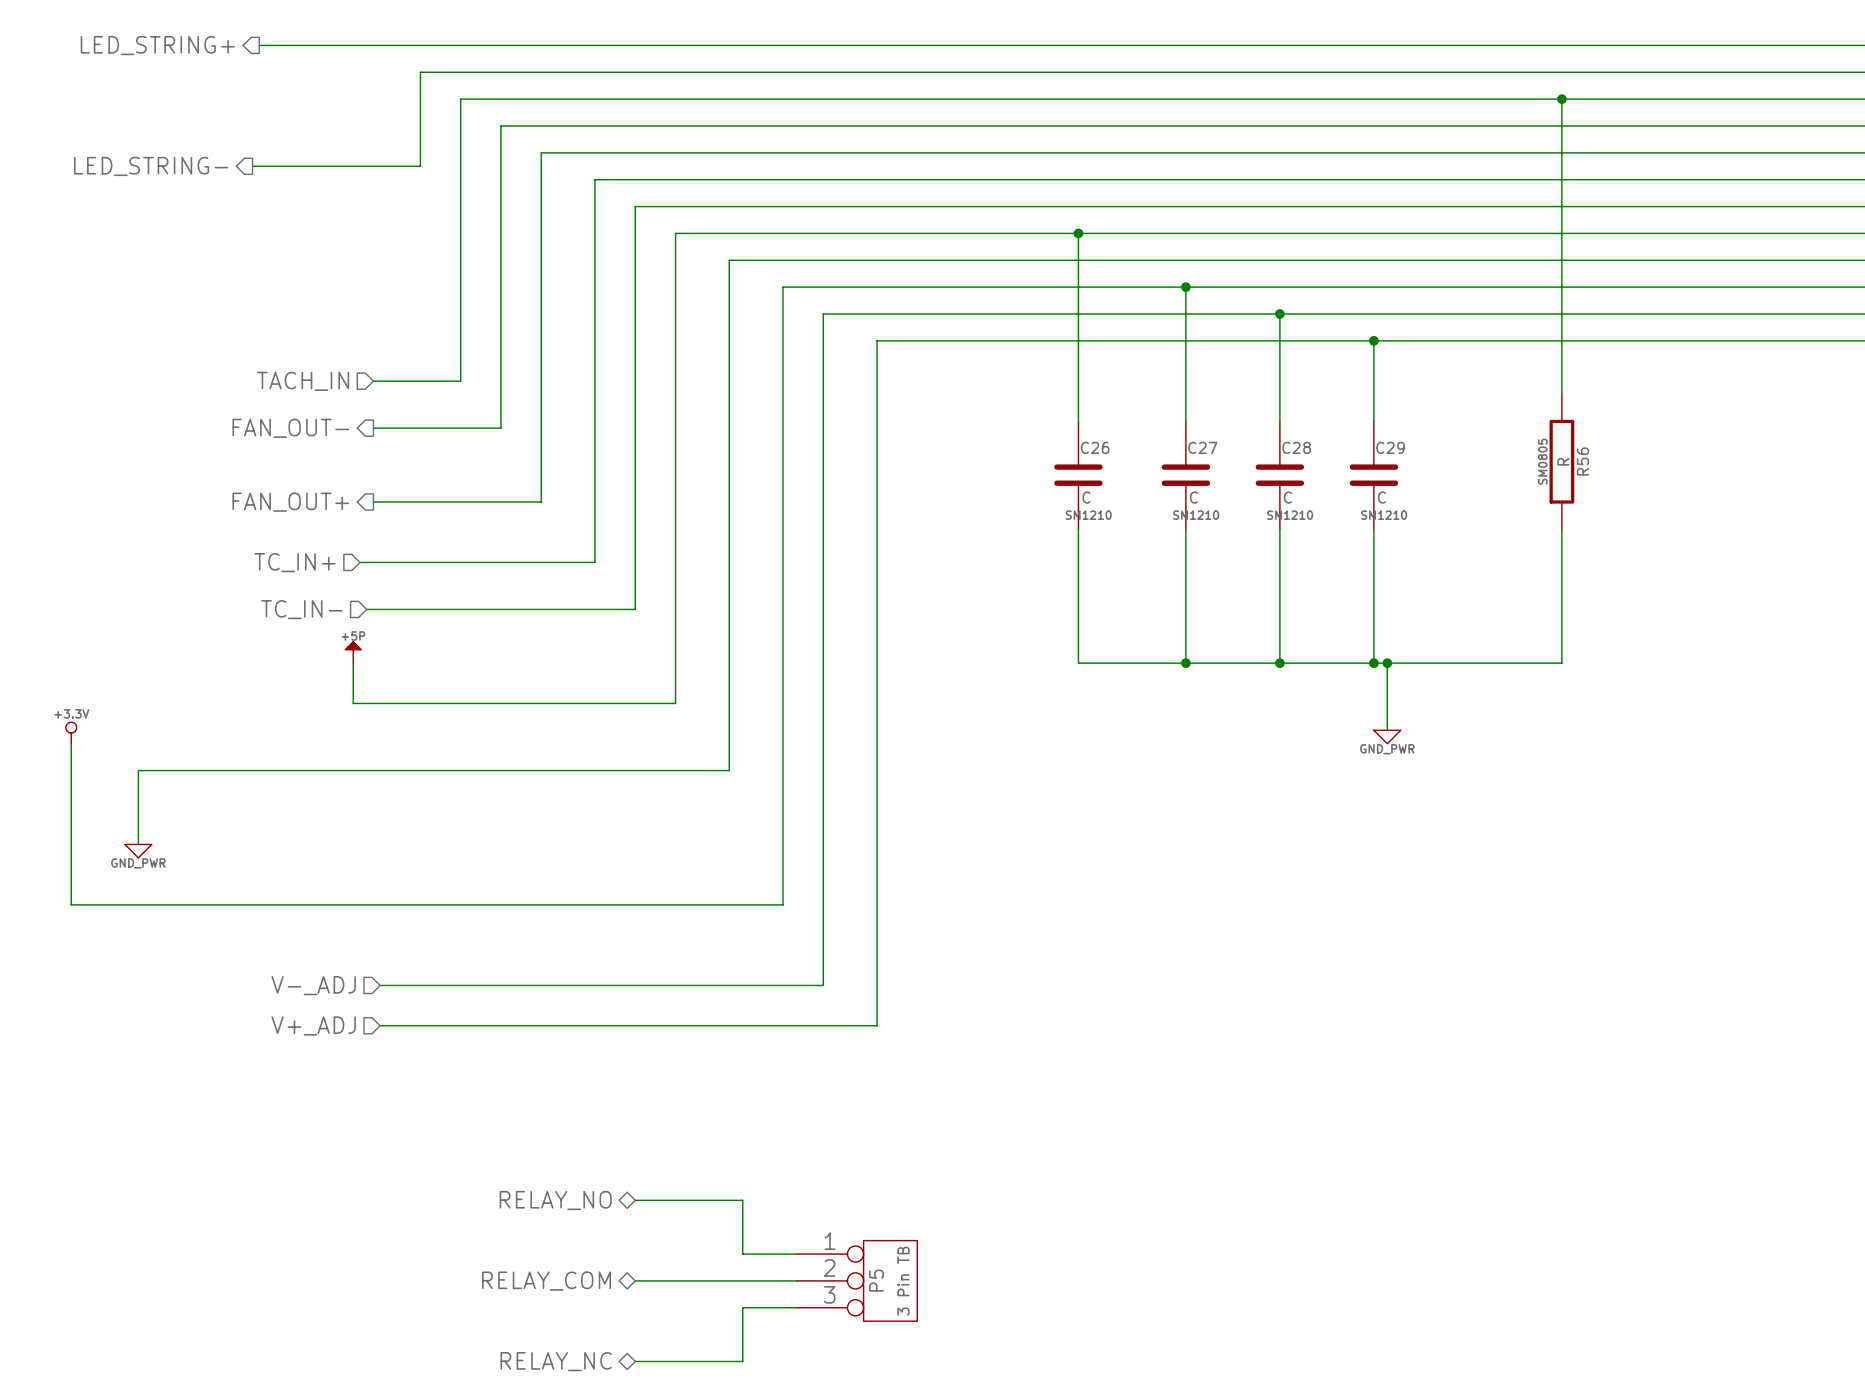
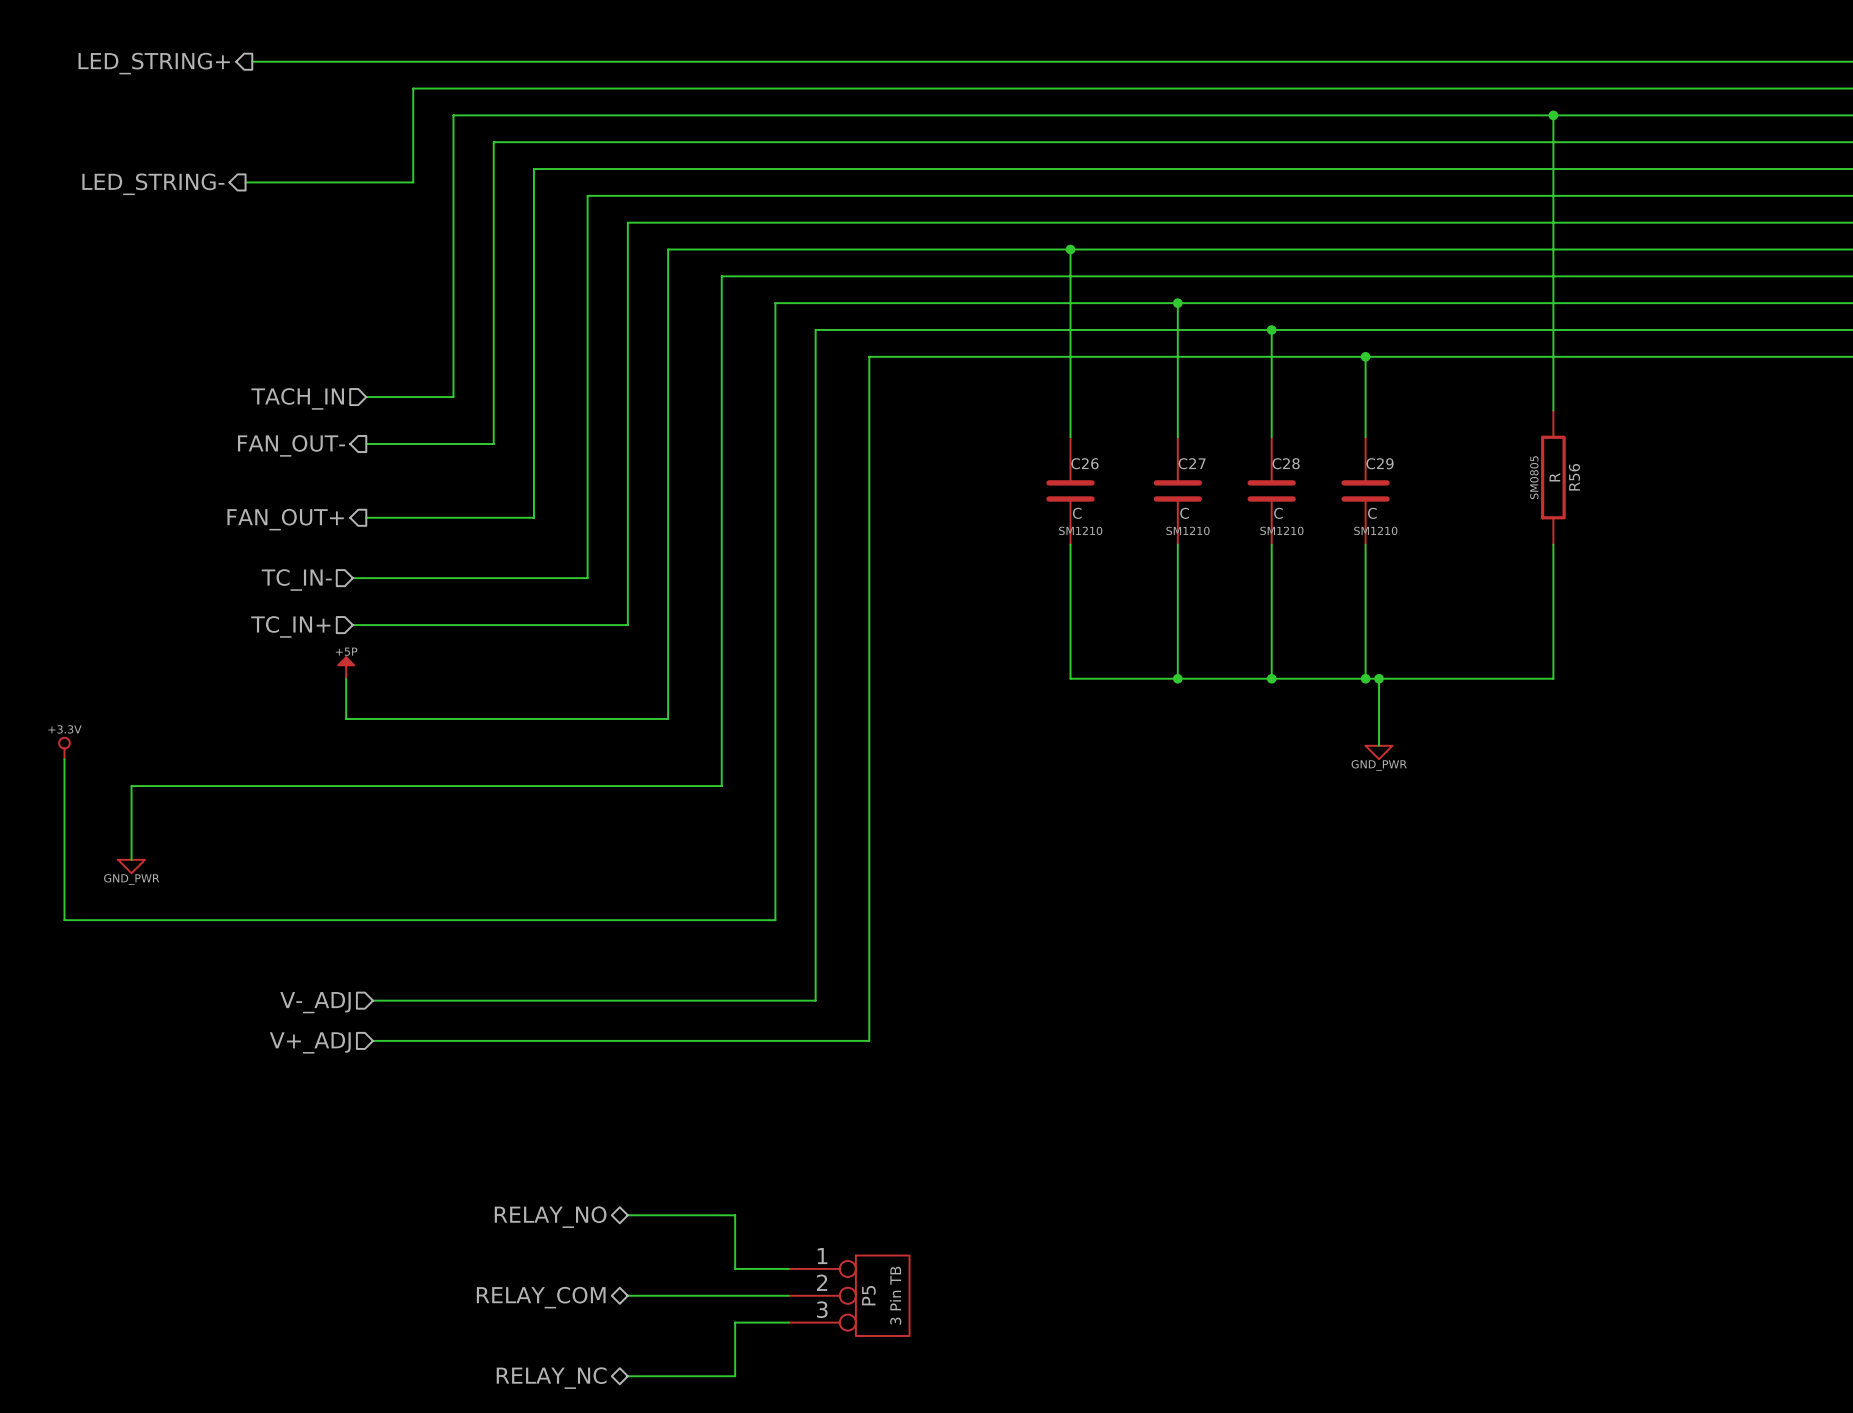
hierarchical label: TC_IN+ (295, 562) -> TC_IN- (296, 579)
hierarchical label: TC_IN- (301, 609) -> TC_IN+ (290, 626)
wire: none -> (352, 625) (359, 625)

